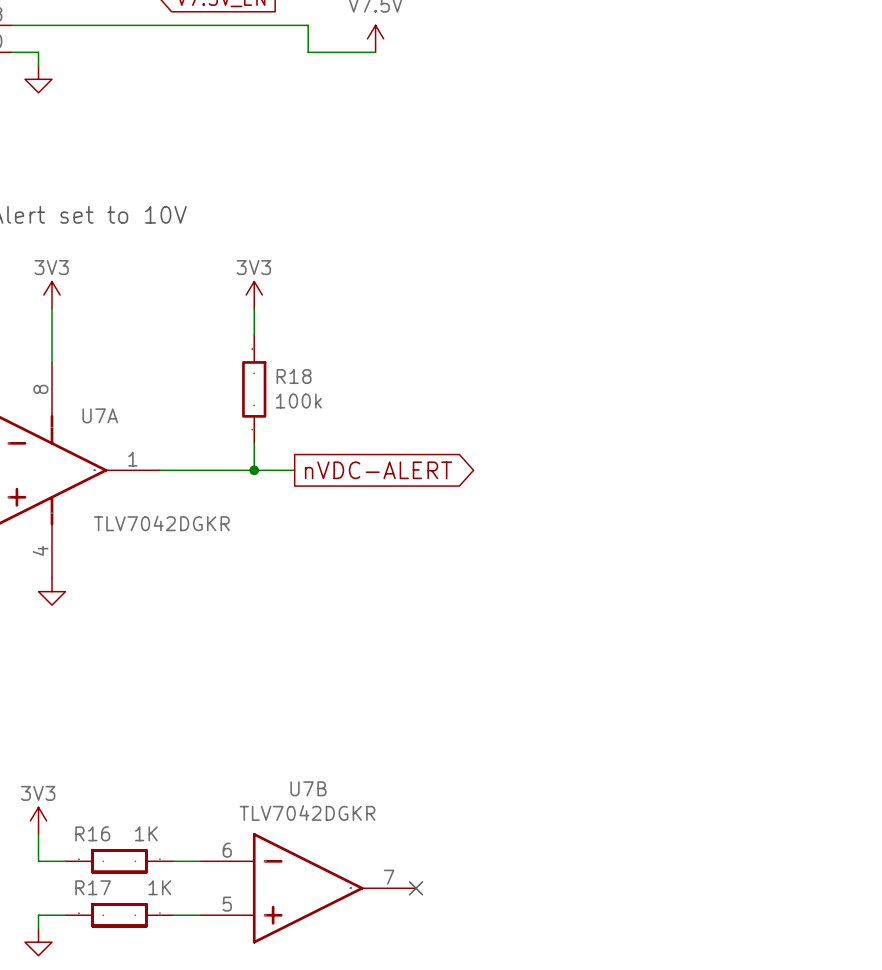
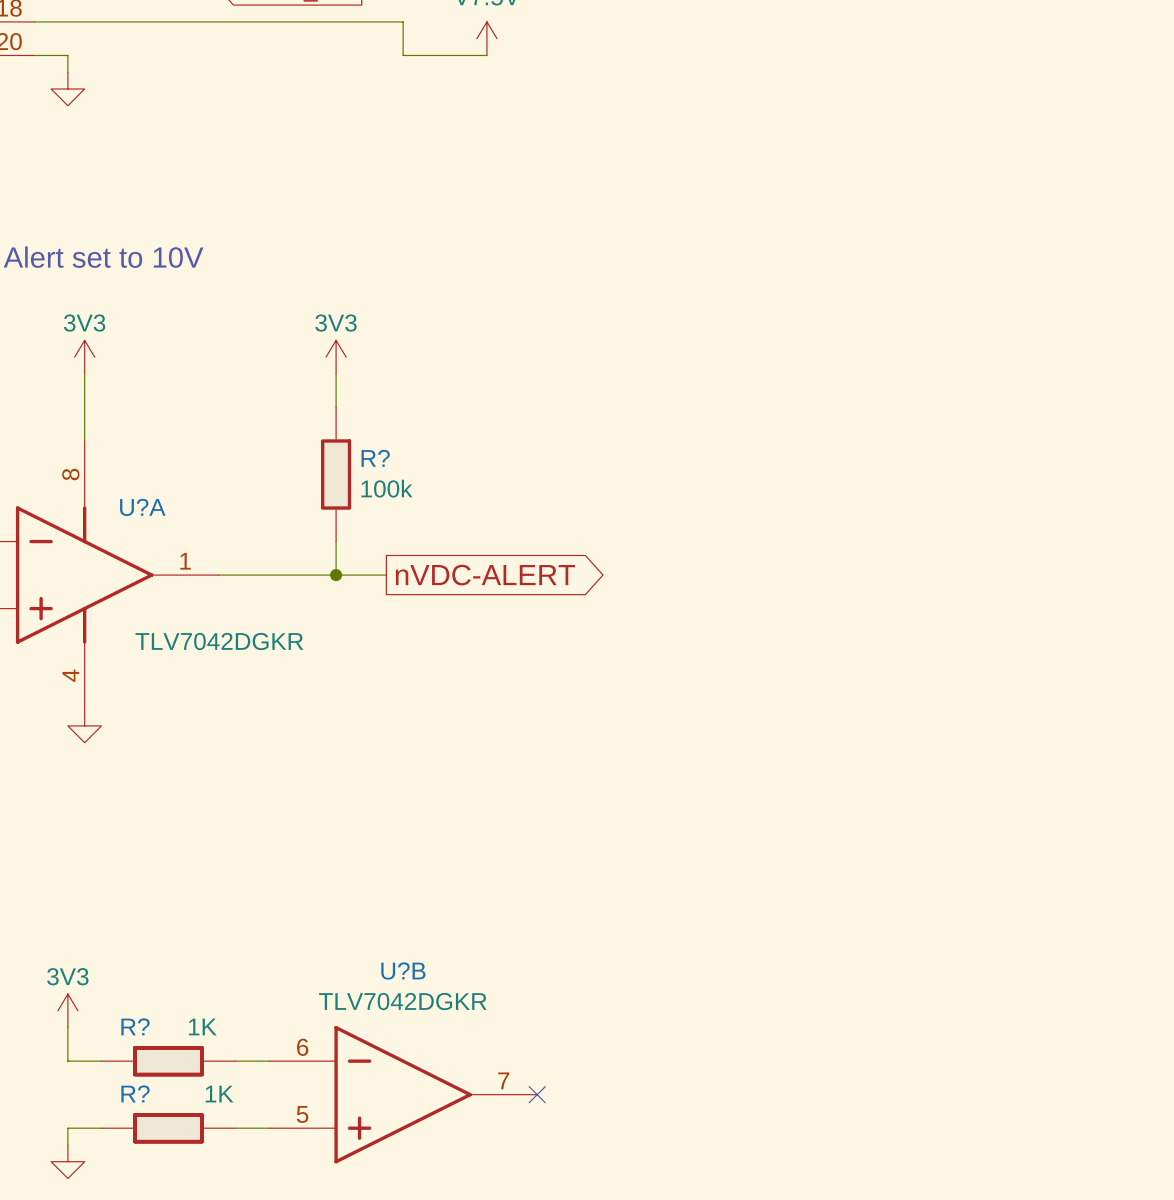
R18 name: R18 (294, 376) -> R? (375, 458)
U7A name: U7A (100, 415) -> U?A (142, 507)
U7B name: U7B (308, 788) -> U?B (403, 971)
R16 name: R16 (92, 833) -> R? (135, 1026)
R17 name: R17 (93, 887) -> R? (135, 1093)

